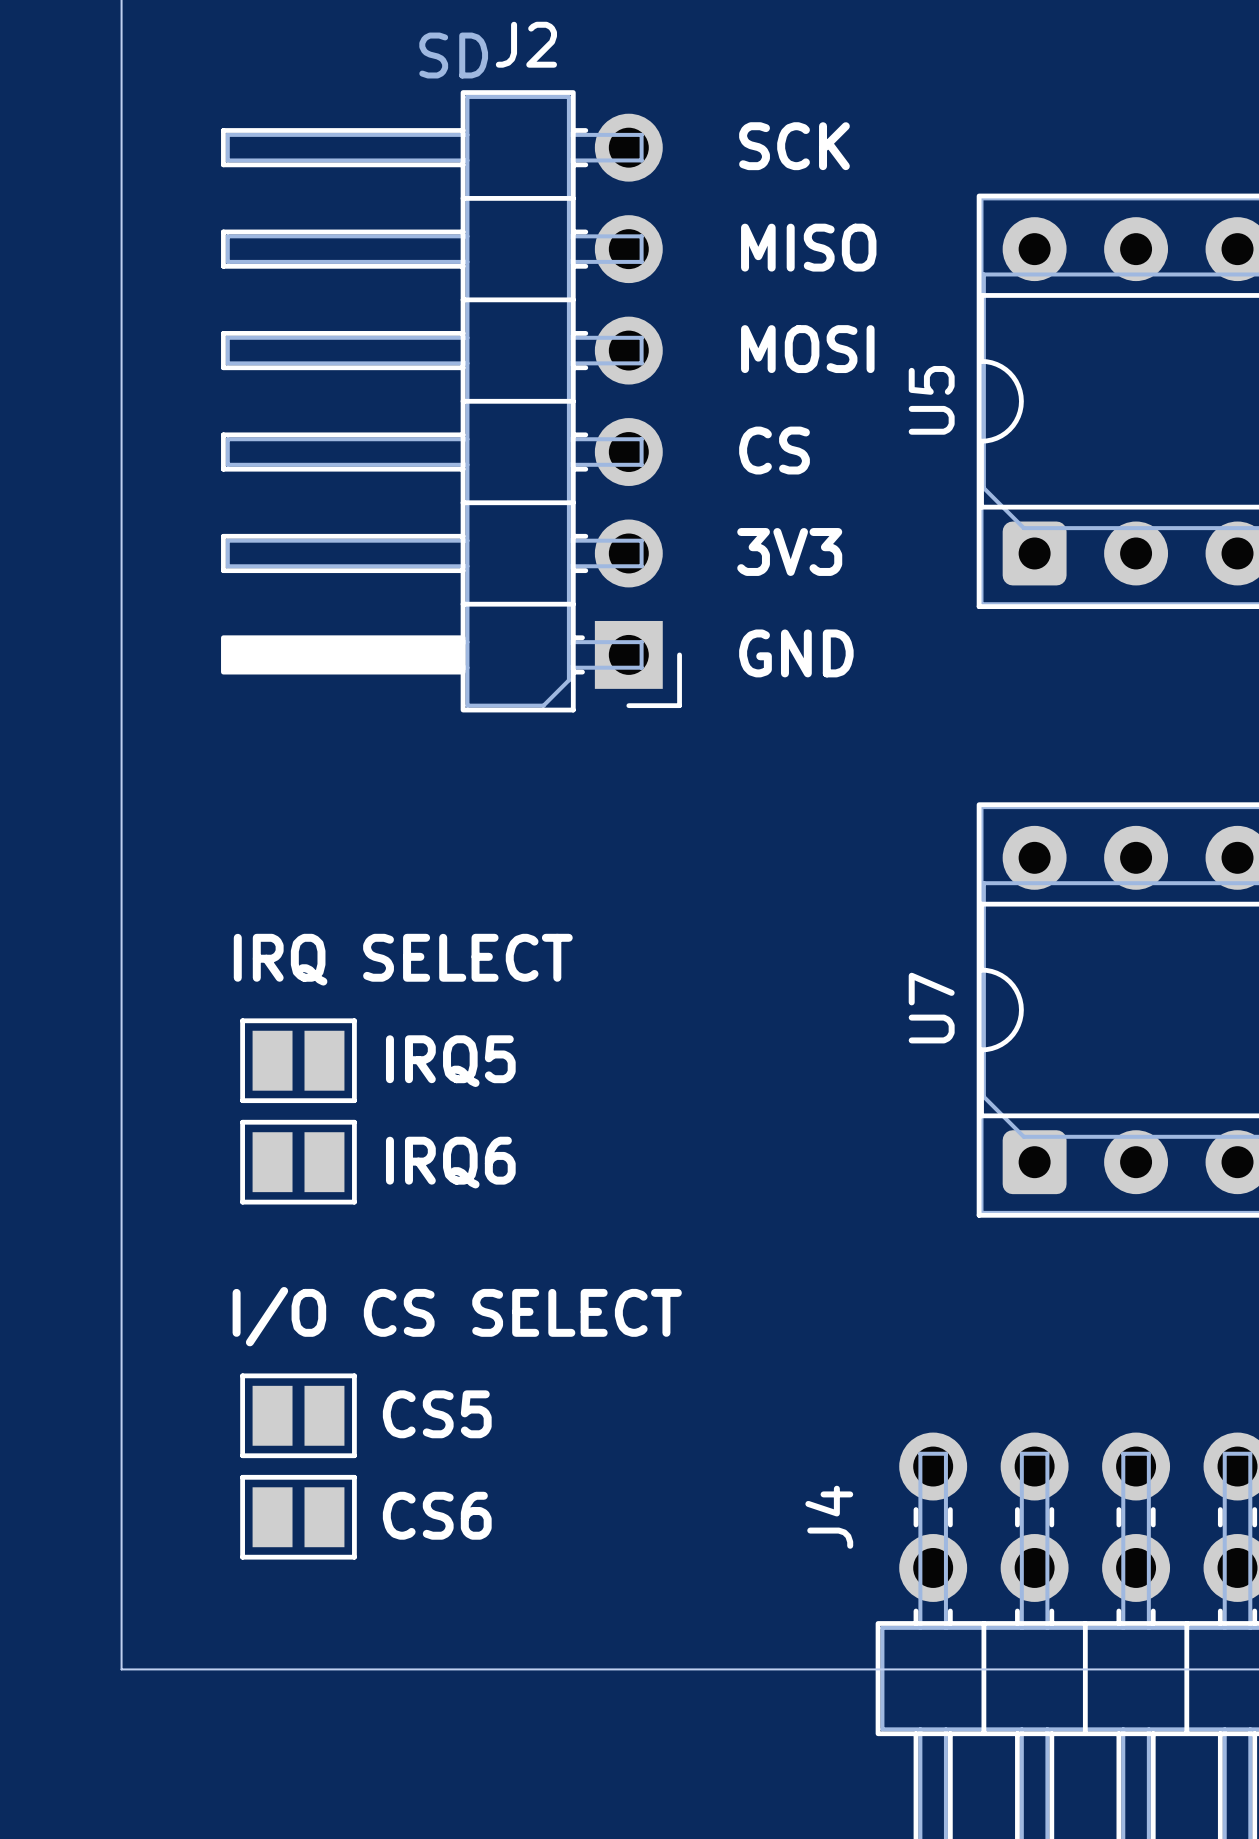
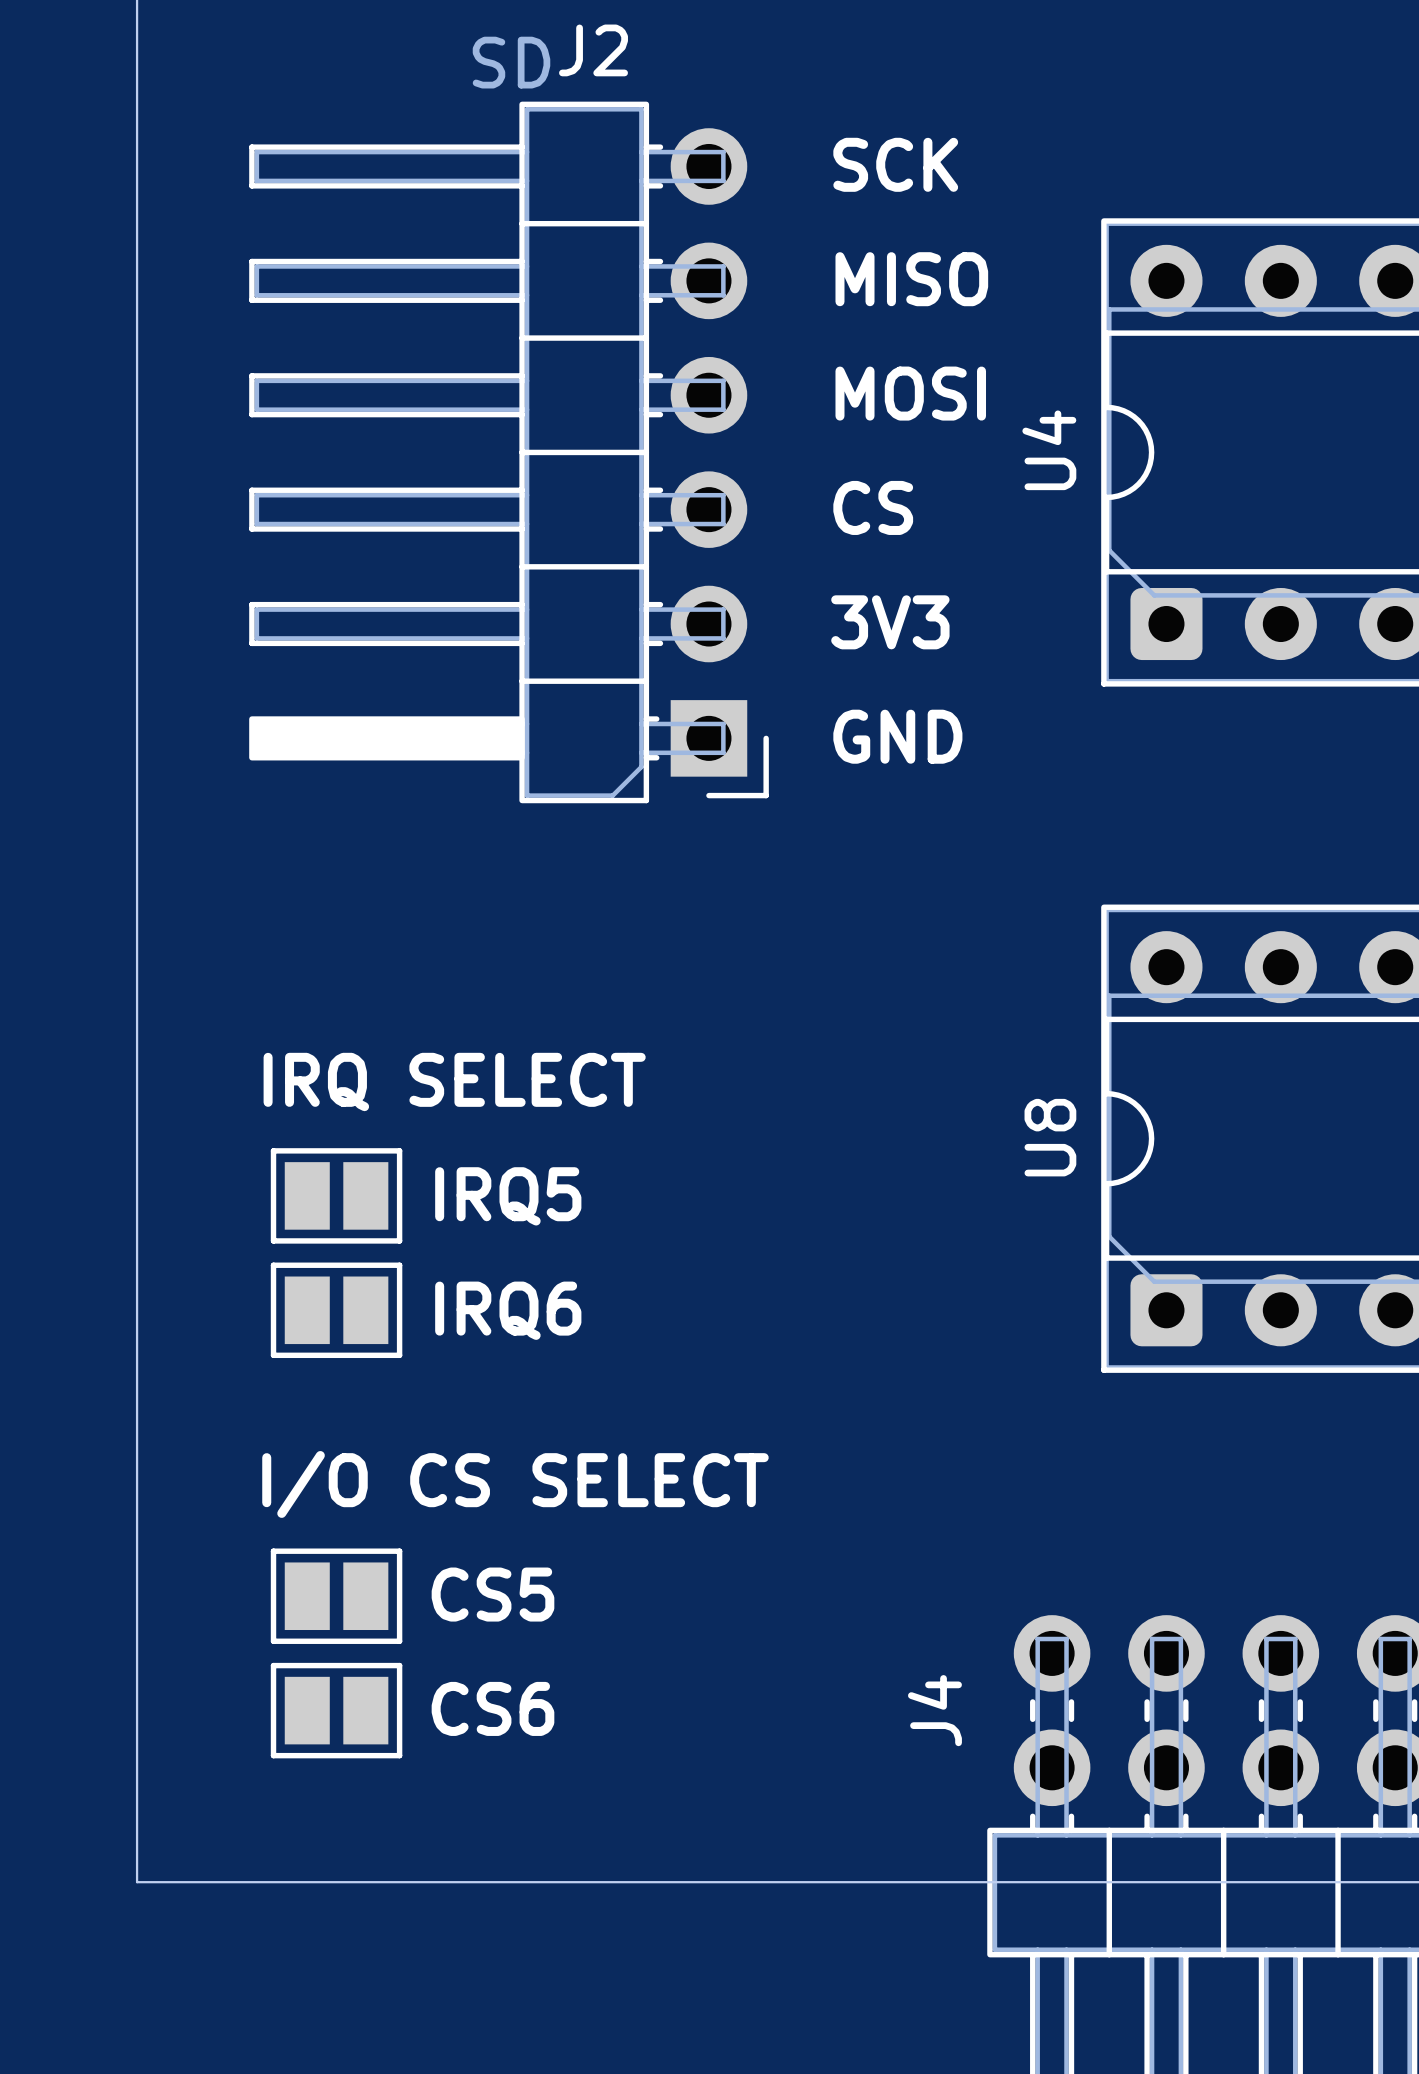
U5 name: U5 (931, 400) -> U4 (1049, 450)
U7 name: U7 (931, 1008) -> U8 (1050, 1137)

